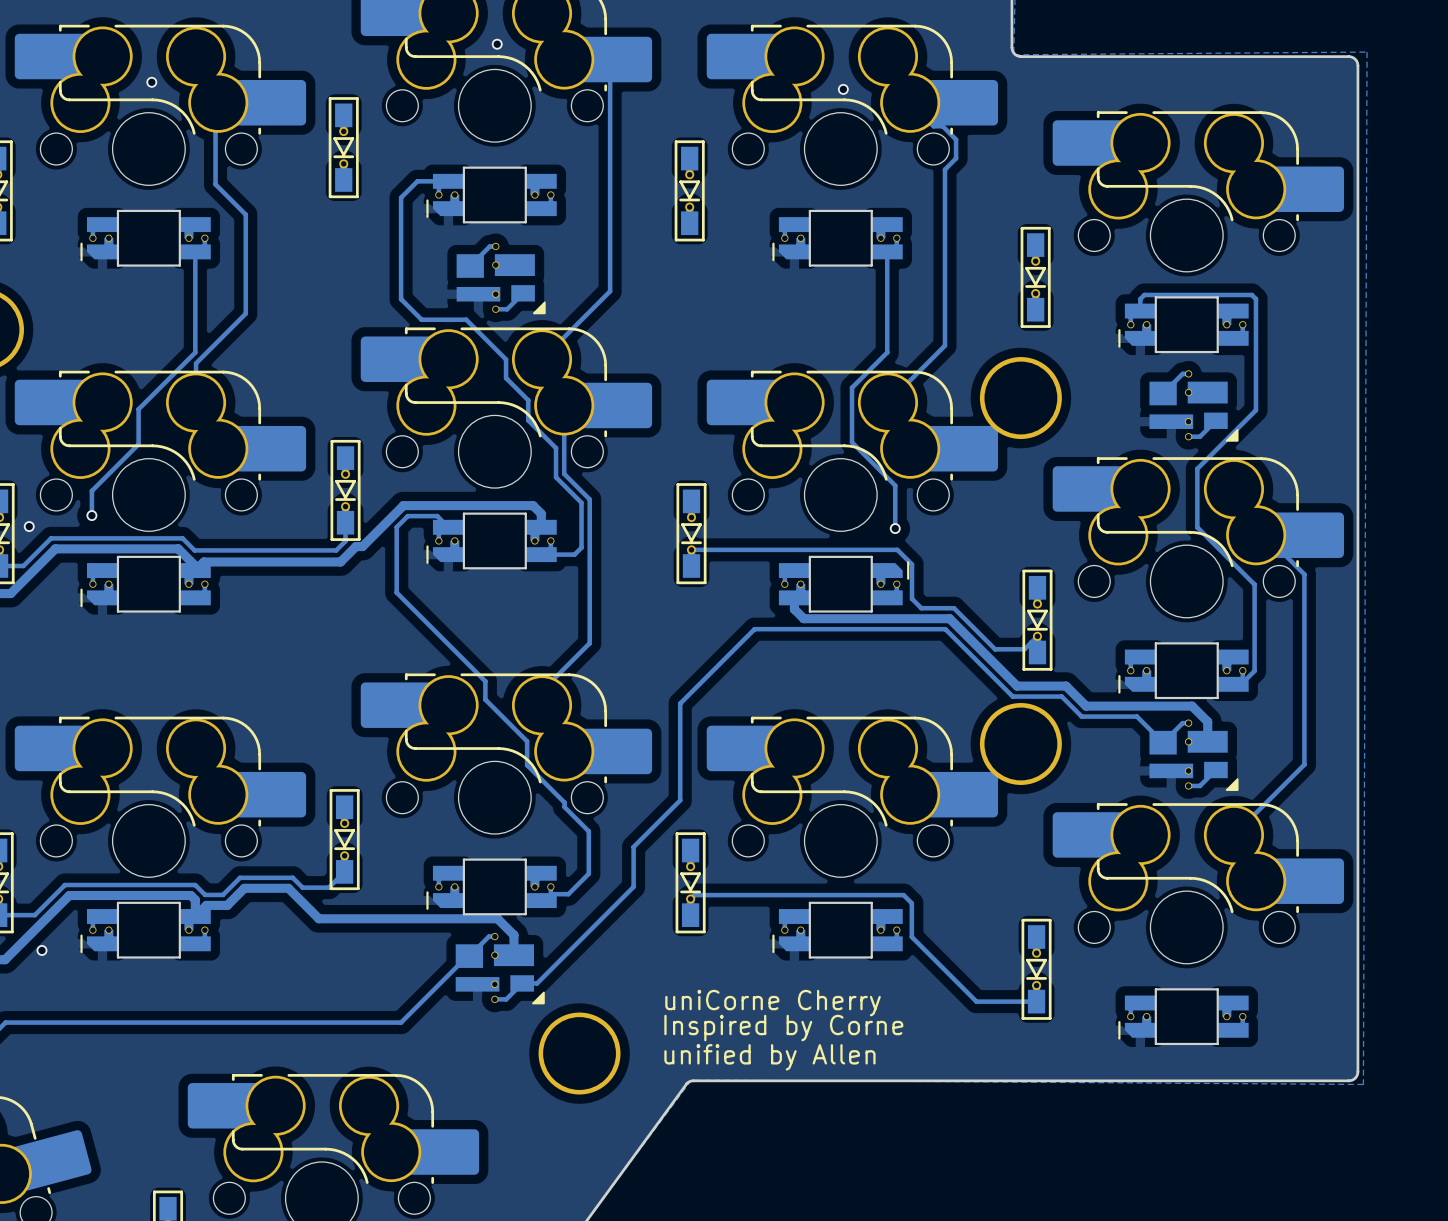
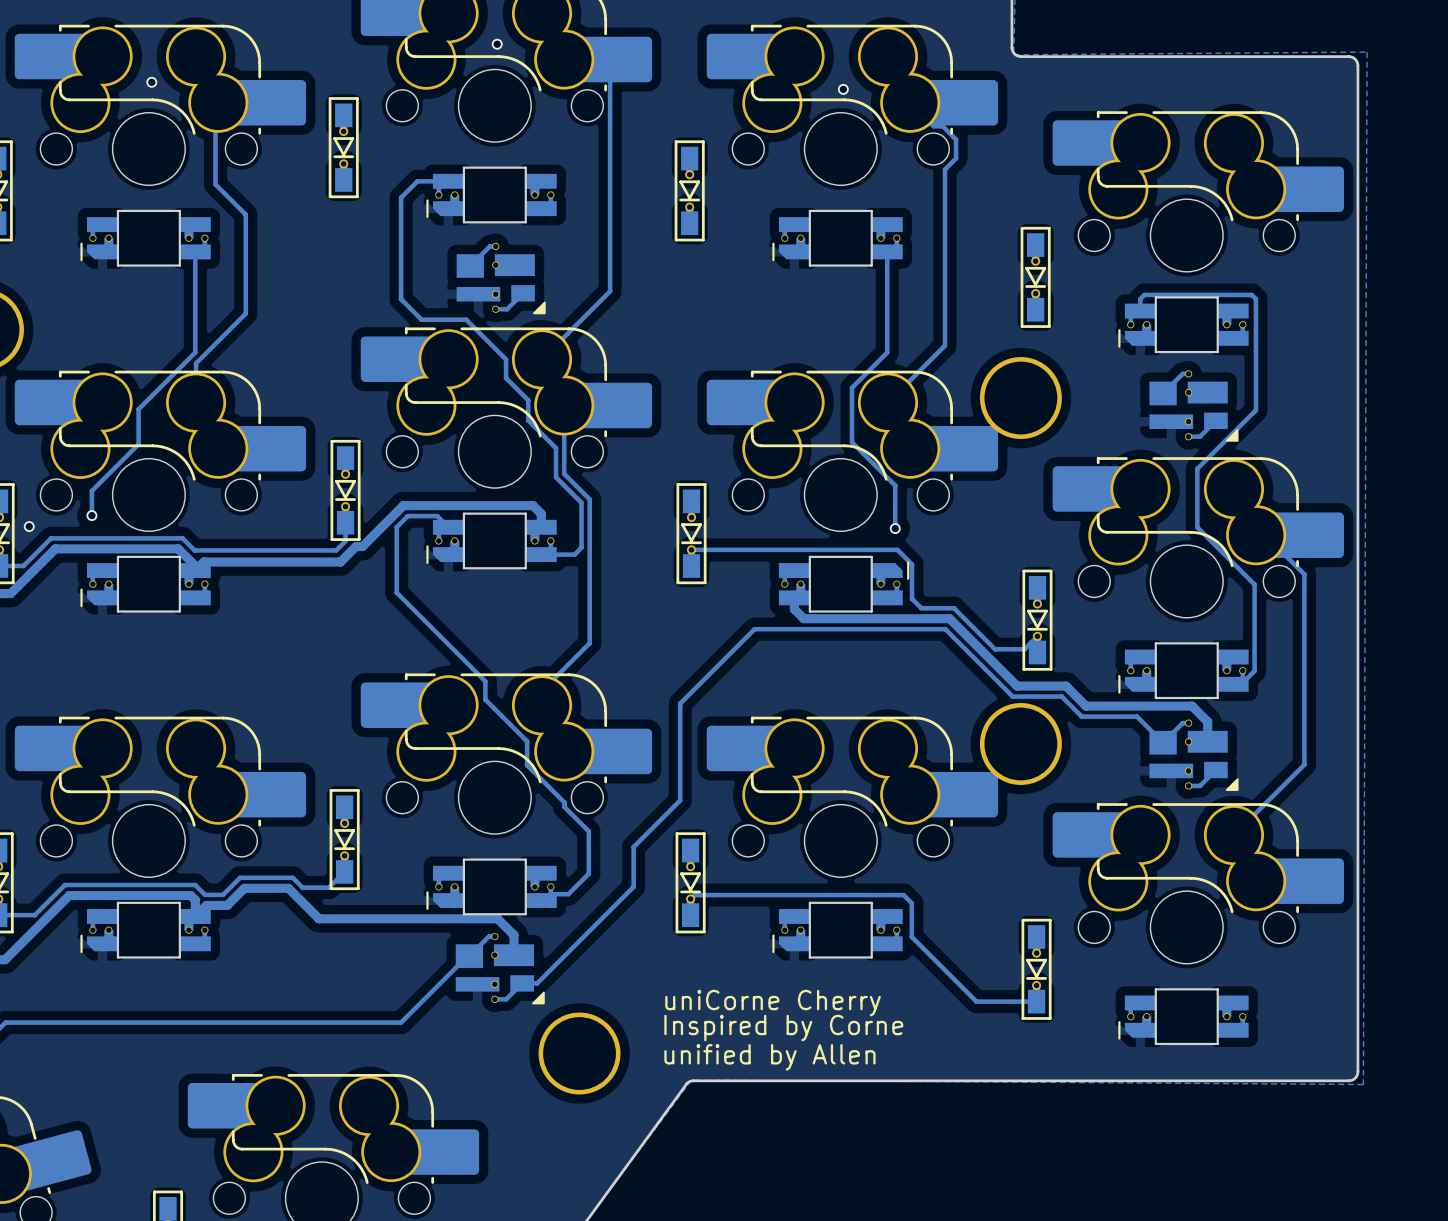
via: (42, 950) -> none

